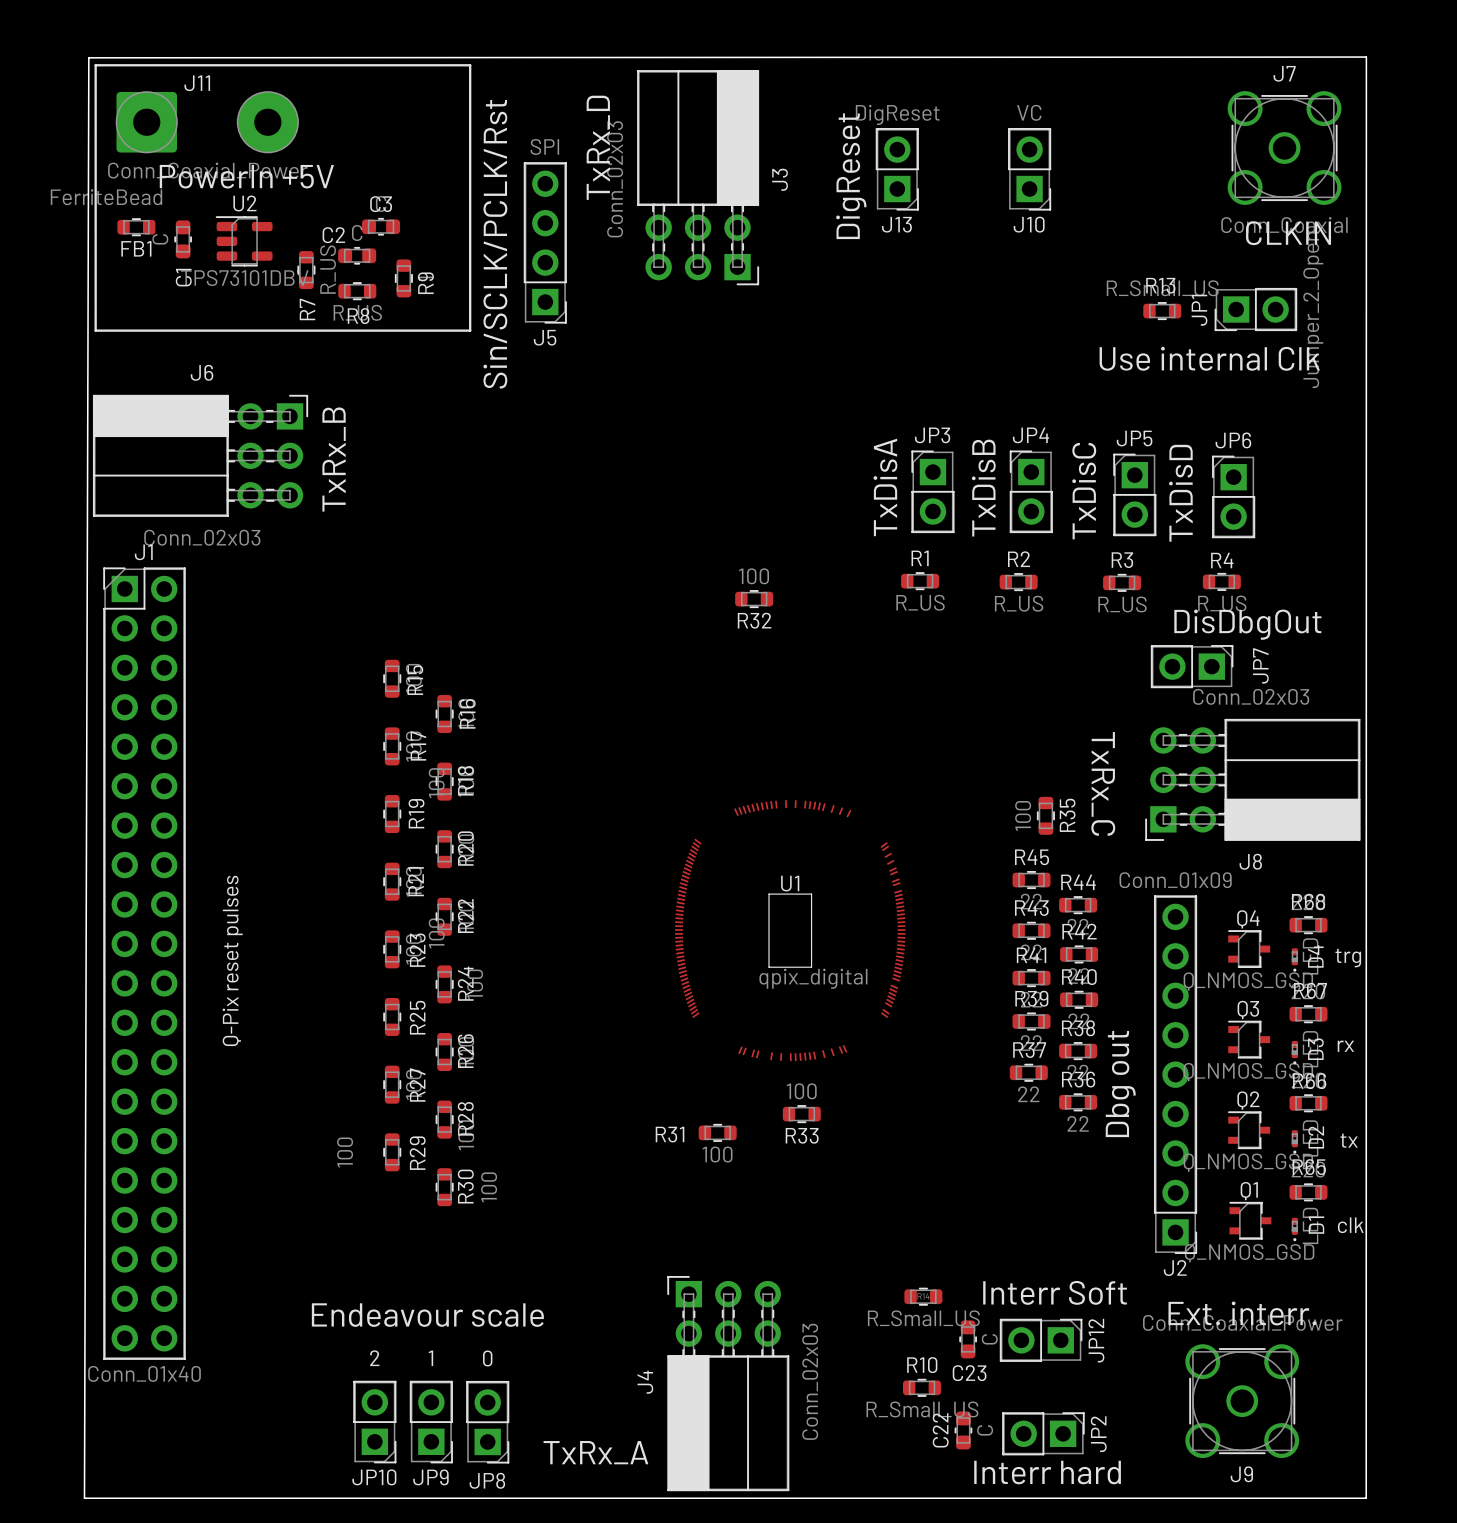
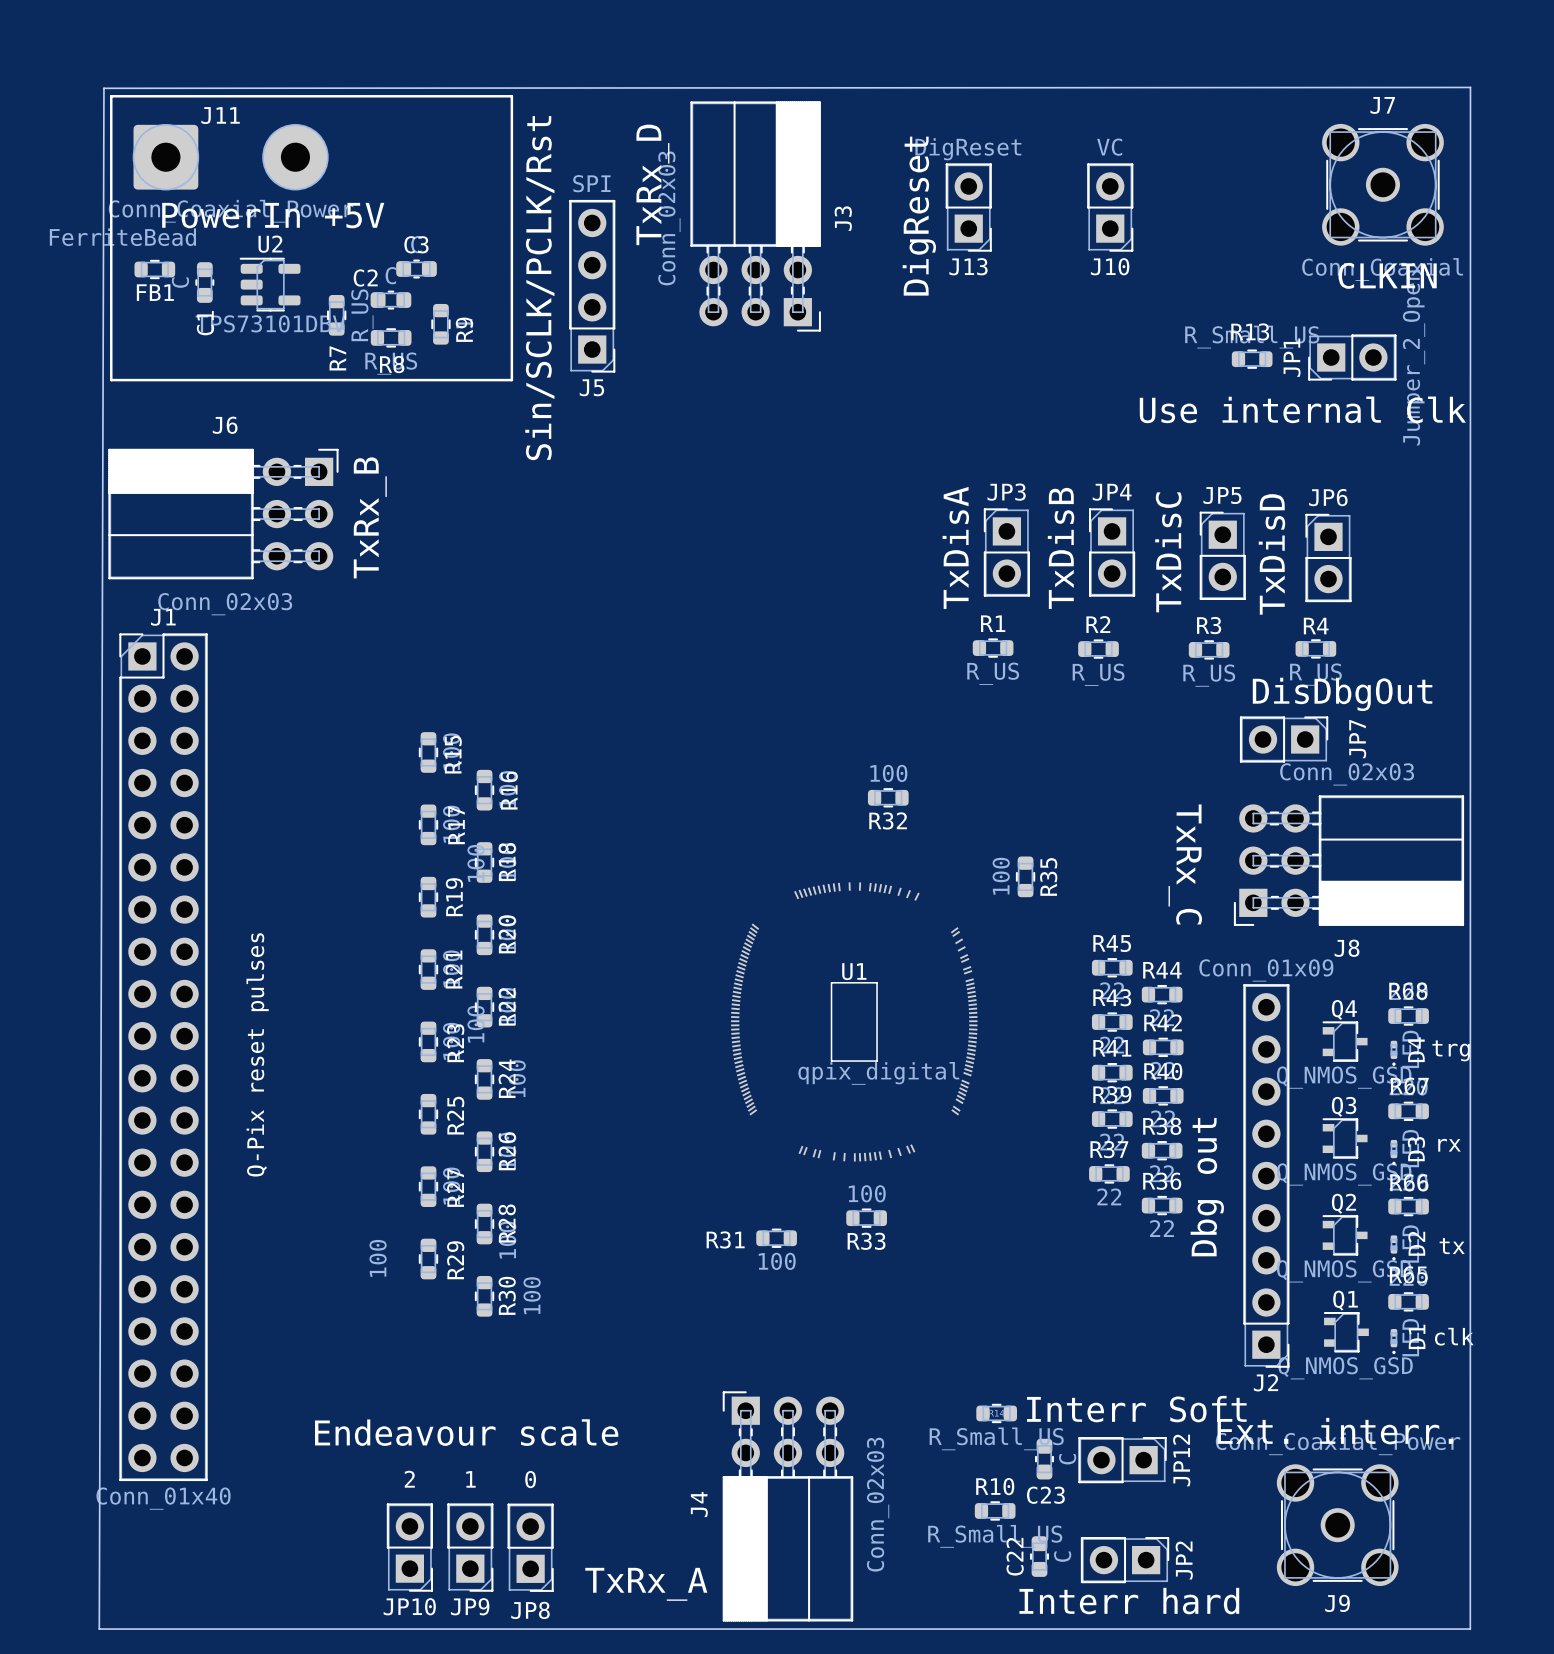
R32 position: (754, 599) -> (888, 797)
R35 position: (1045, 815) -> (1025, 876)

